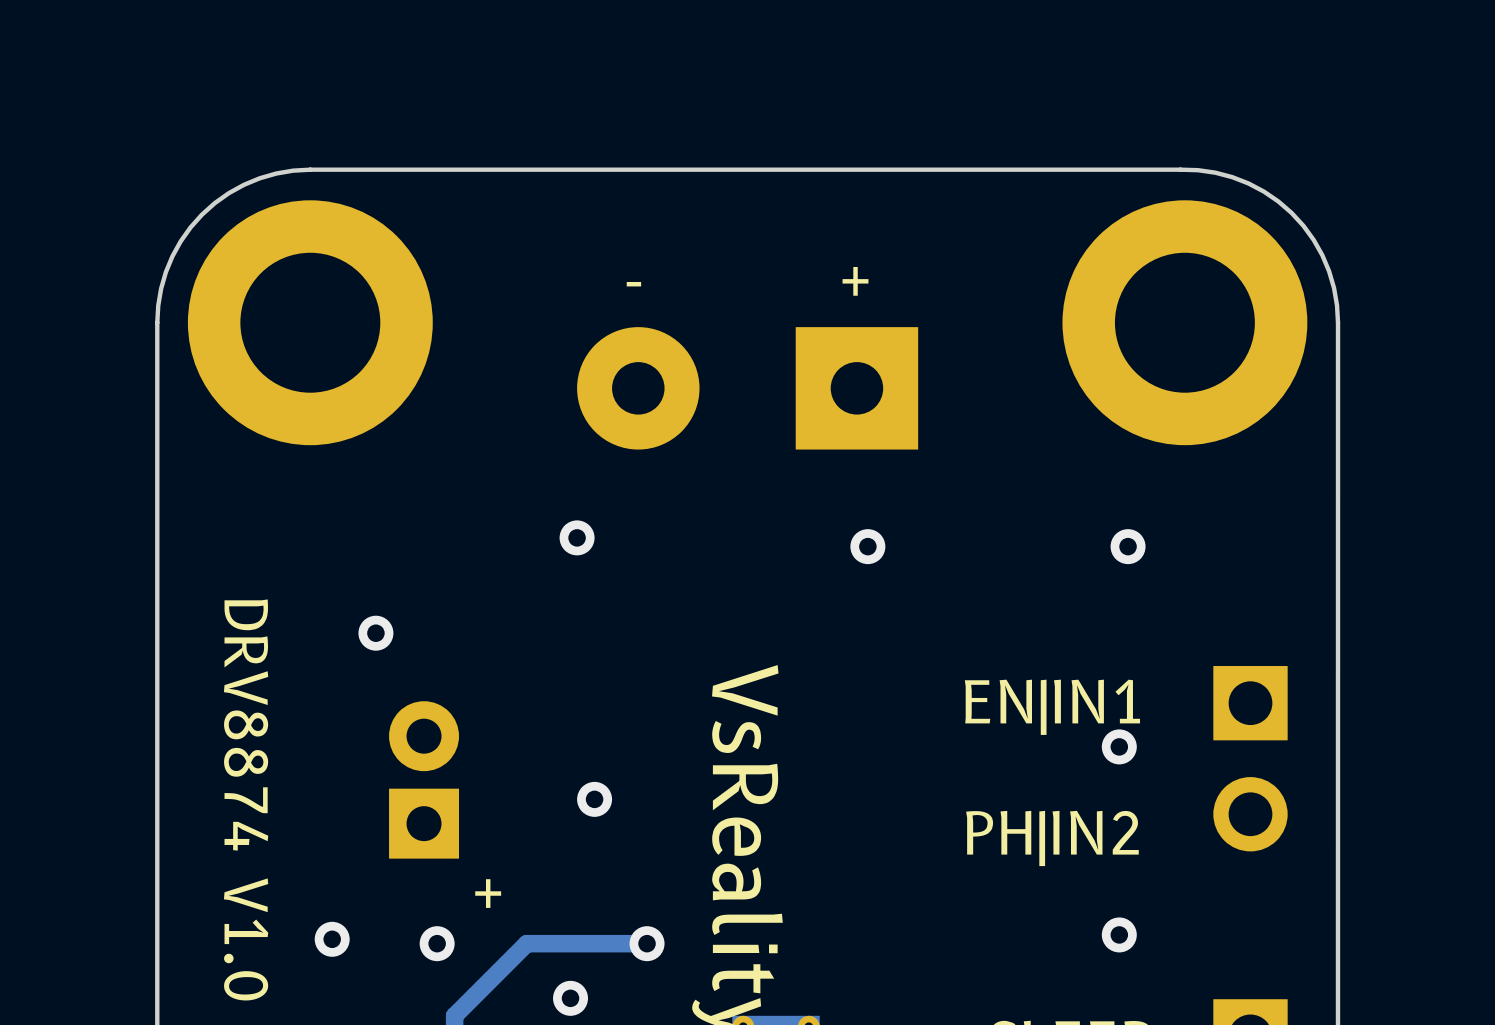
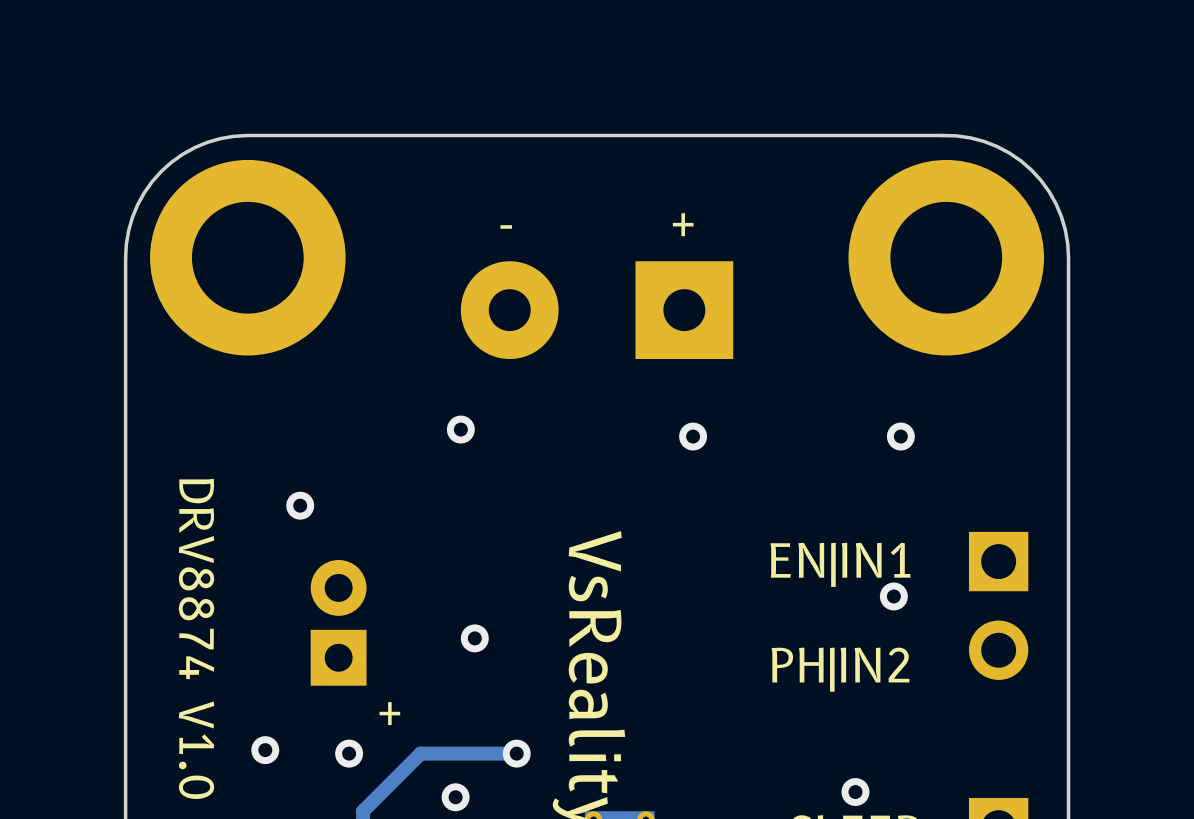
via: (1119, 934) -> none
via: none -> (855, 792)

